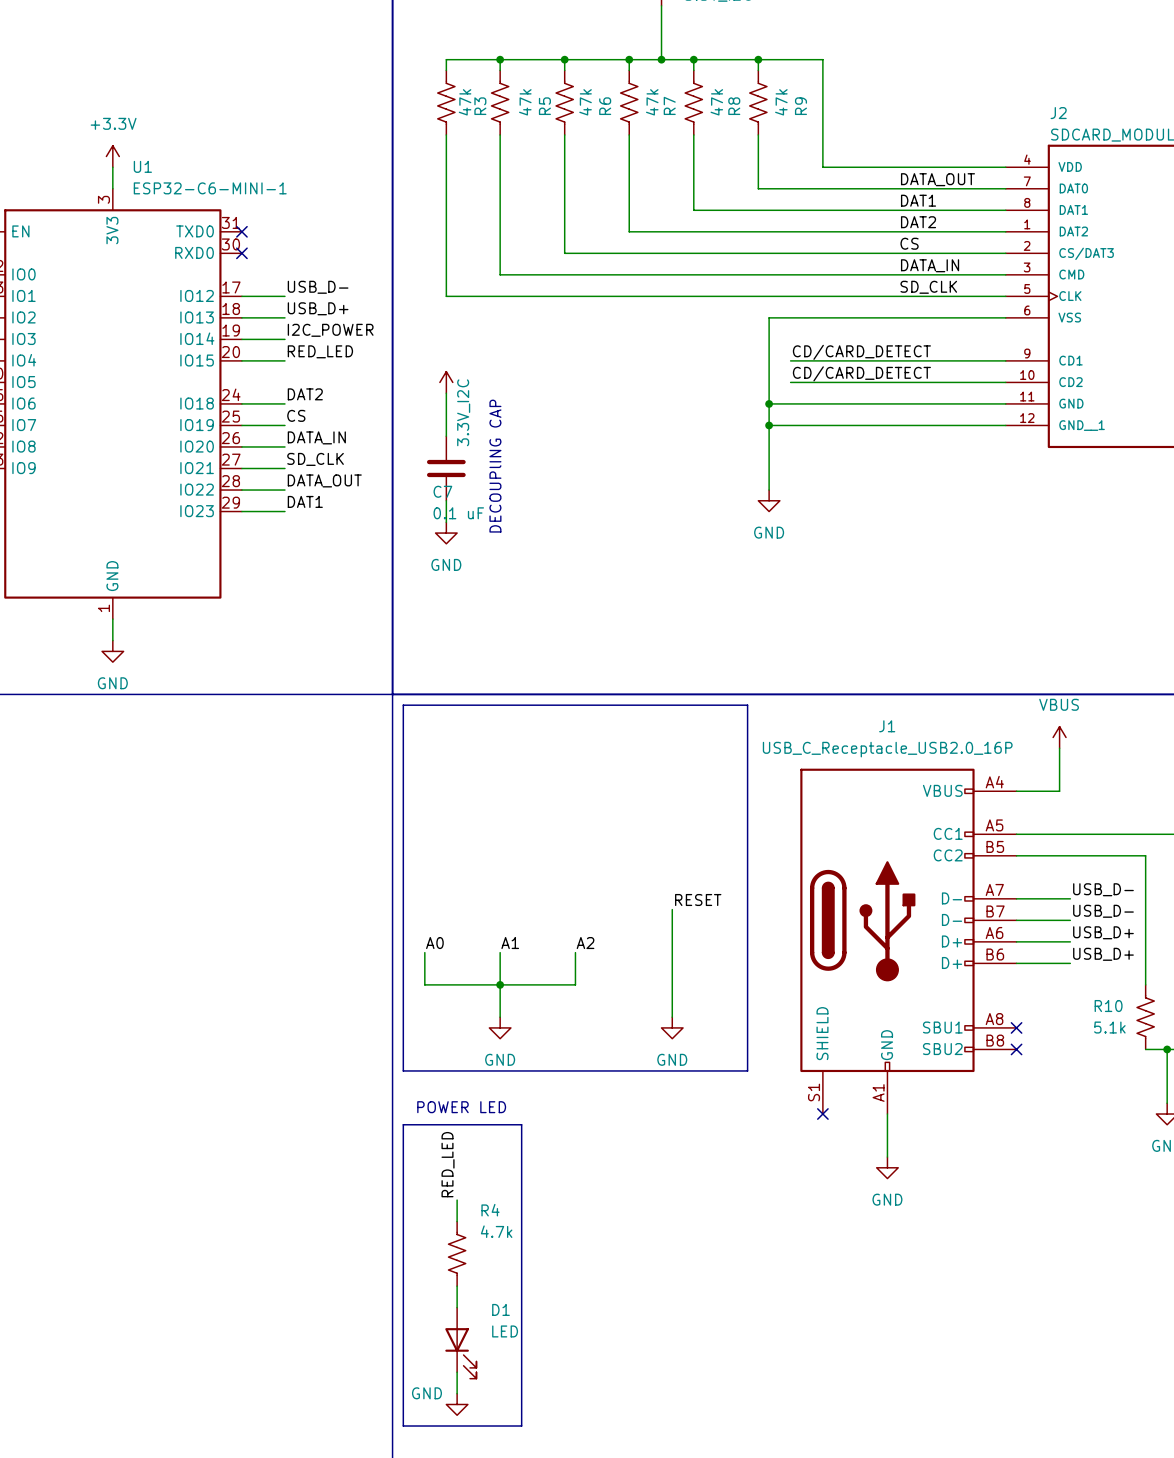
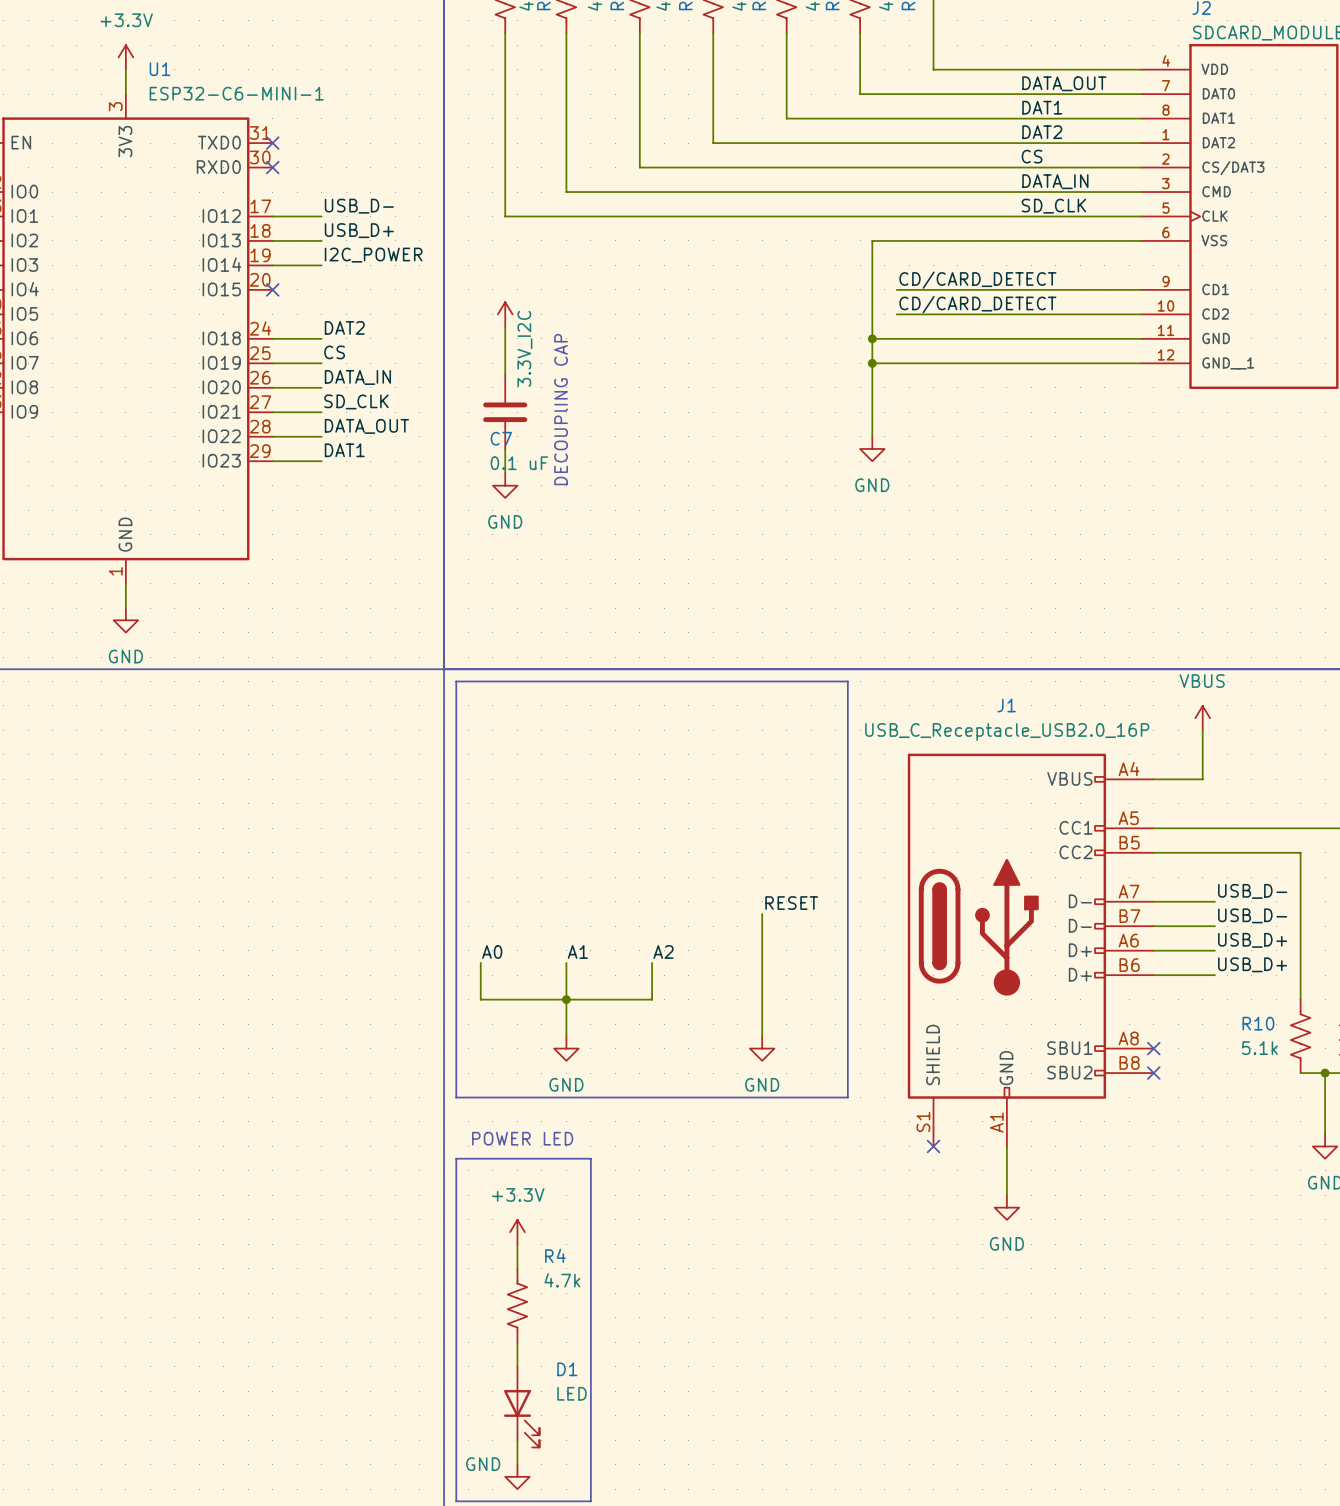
label: RED_LED (320, 351) -> none
wire: (241, 360) (284, 360) -> none
no-connect mark: none -> (272, 289)
label: RED_LED (448, 1164) -> none
power symbol: none -> +3.3V (517, 1232)

